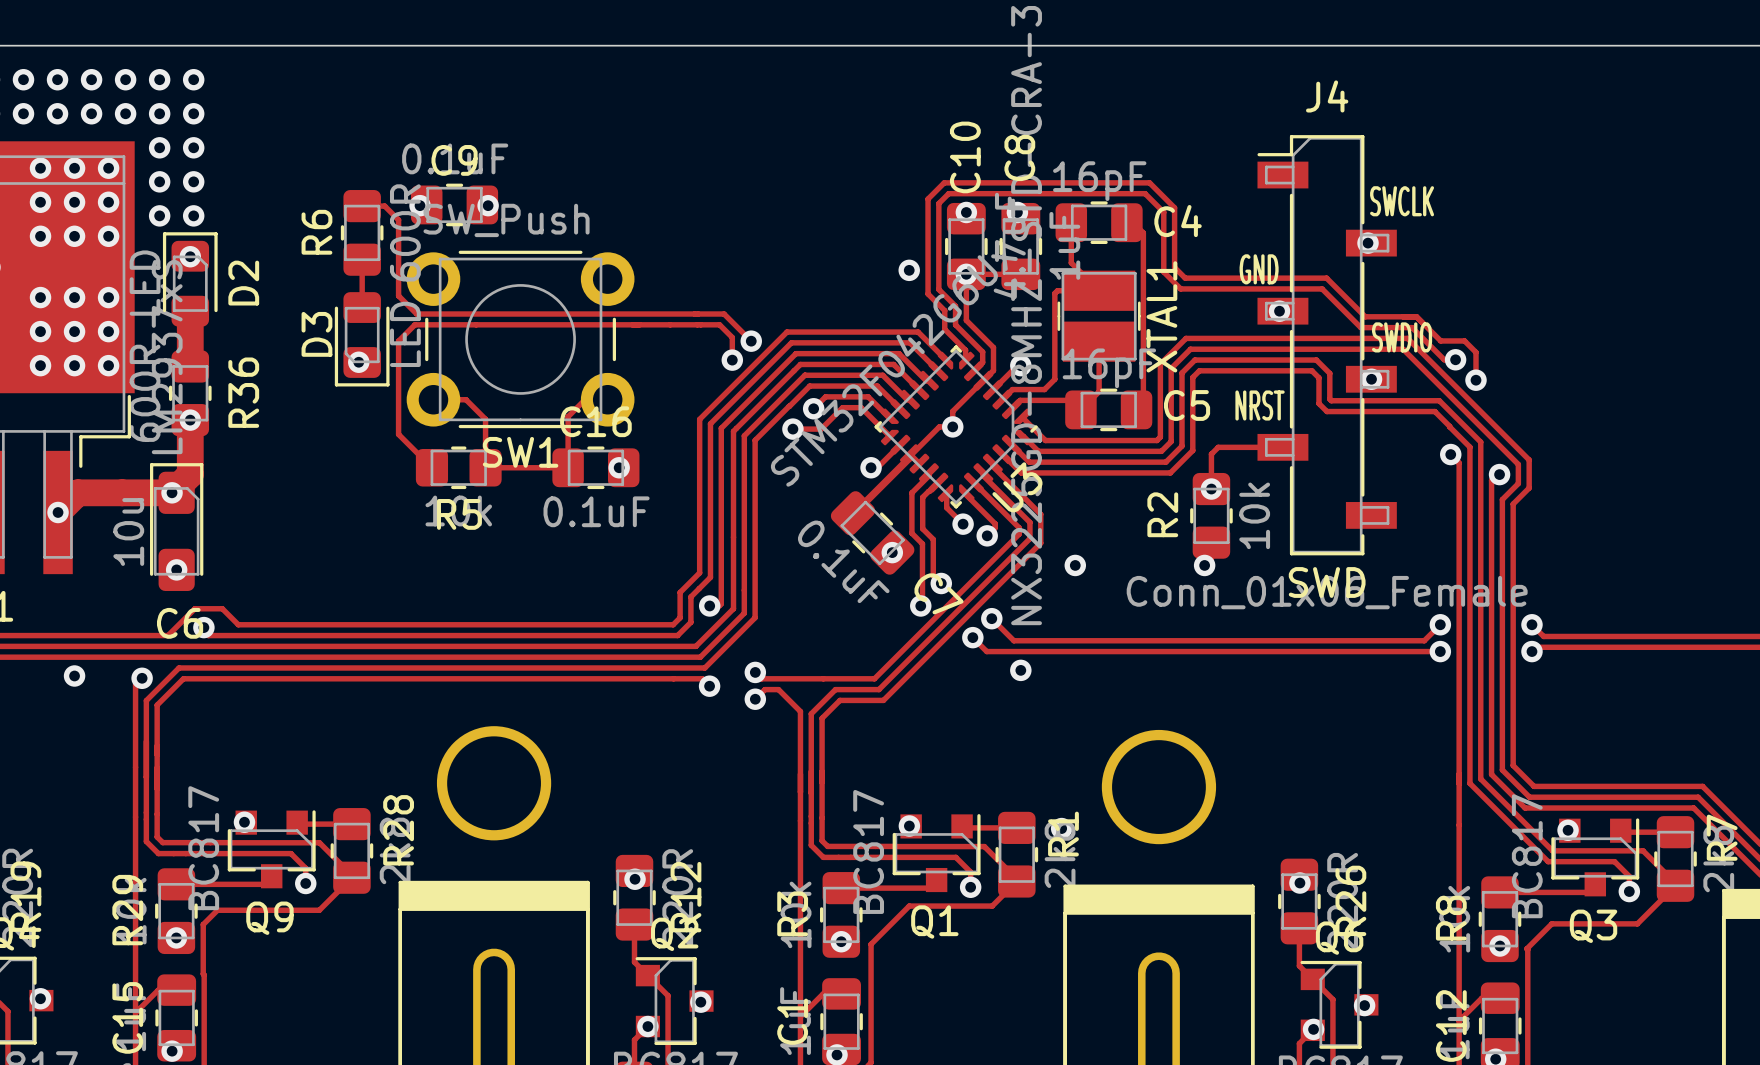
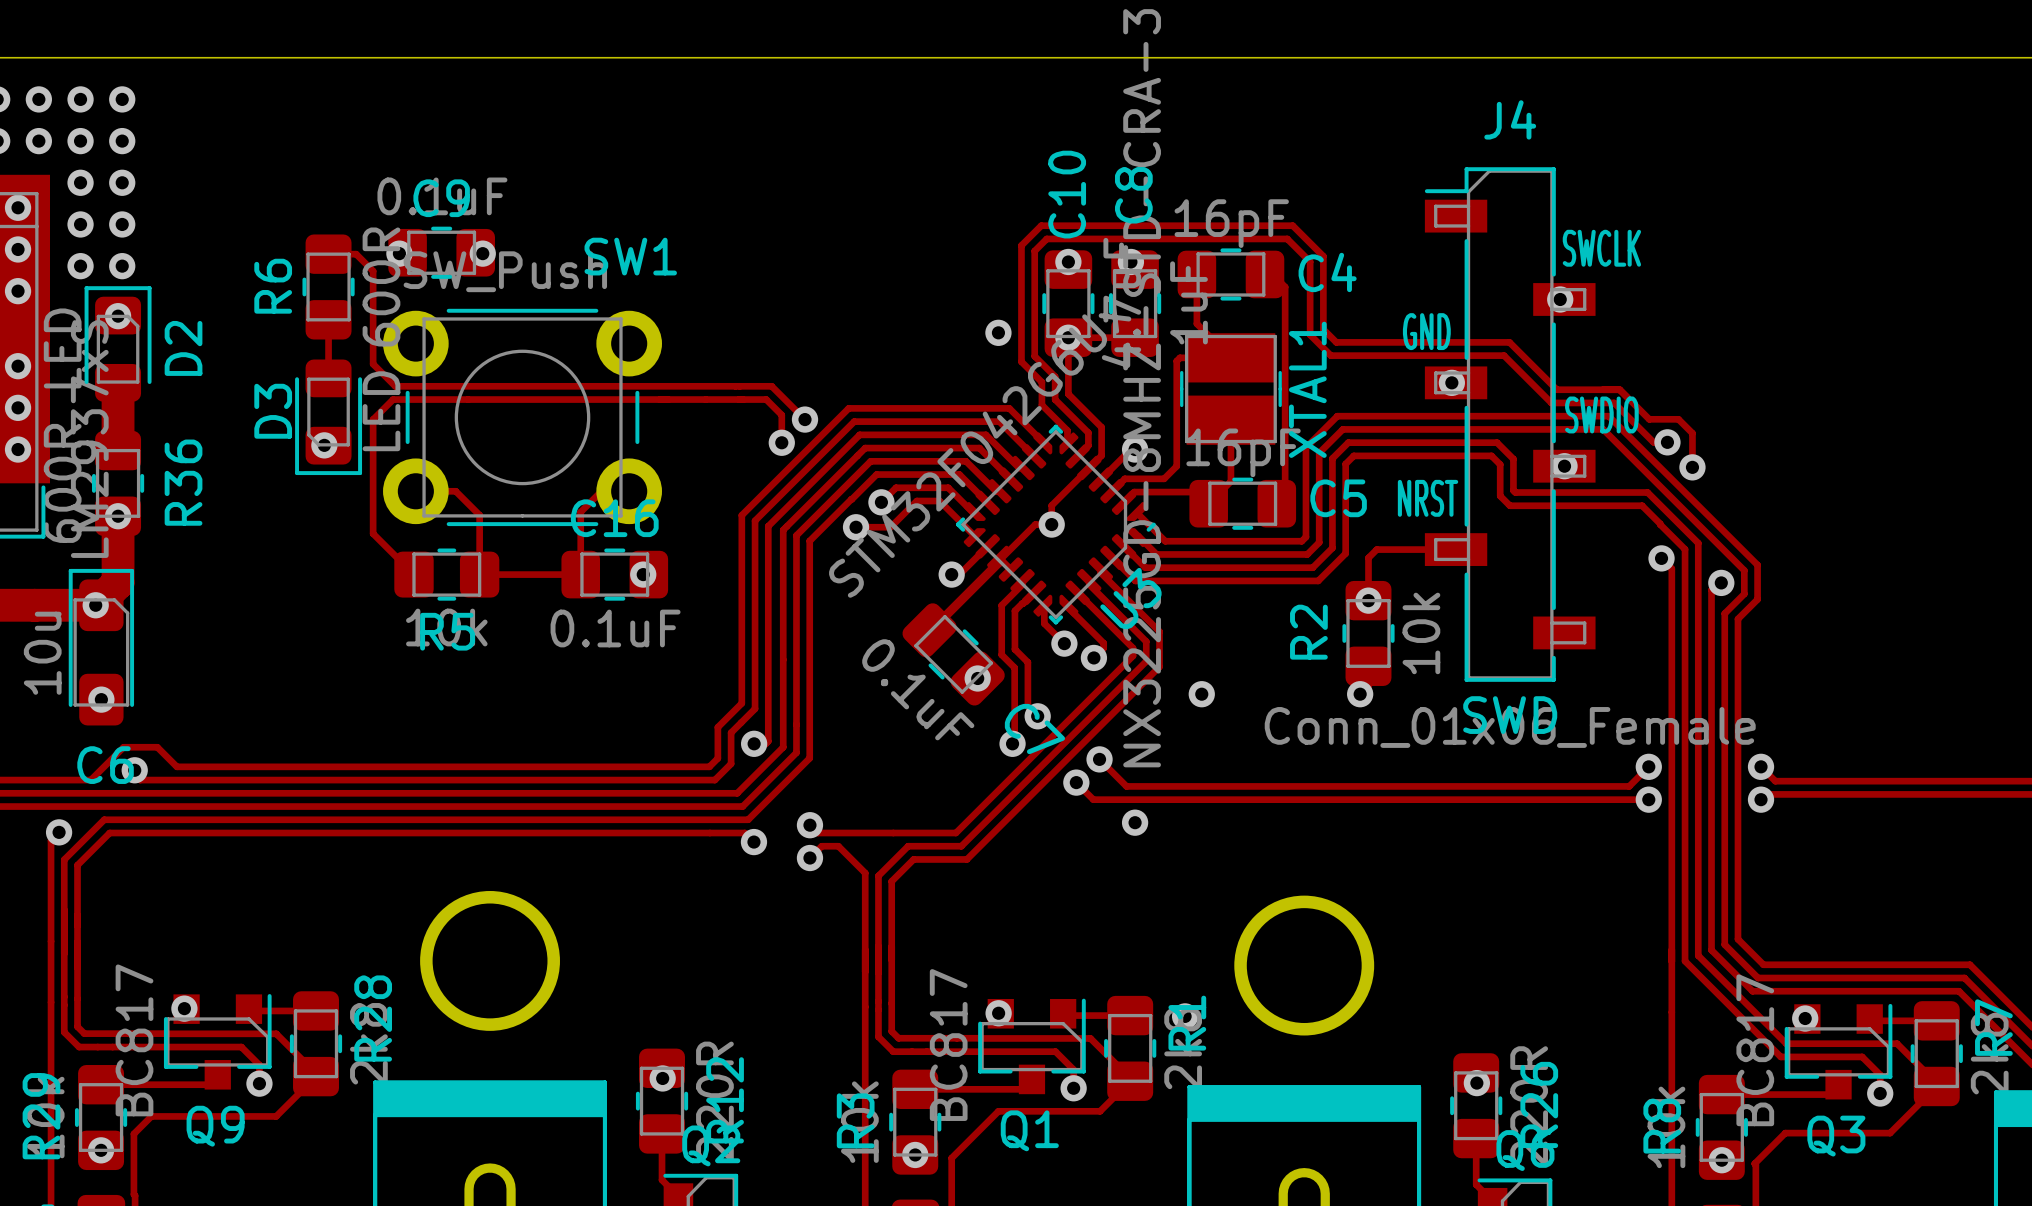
SW1 name position: SW1 (520, 452) -> SW1 (630, 256)

